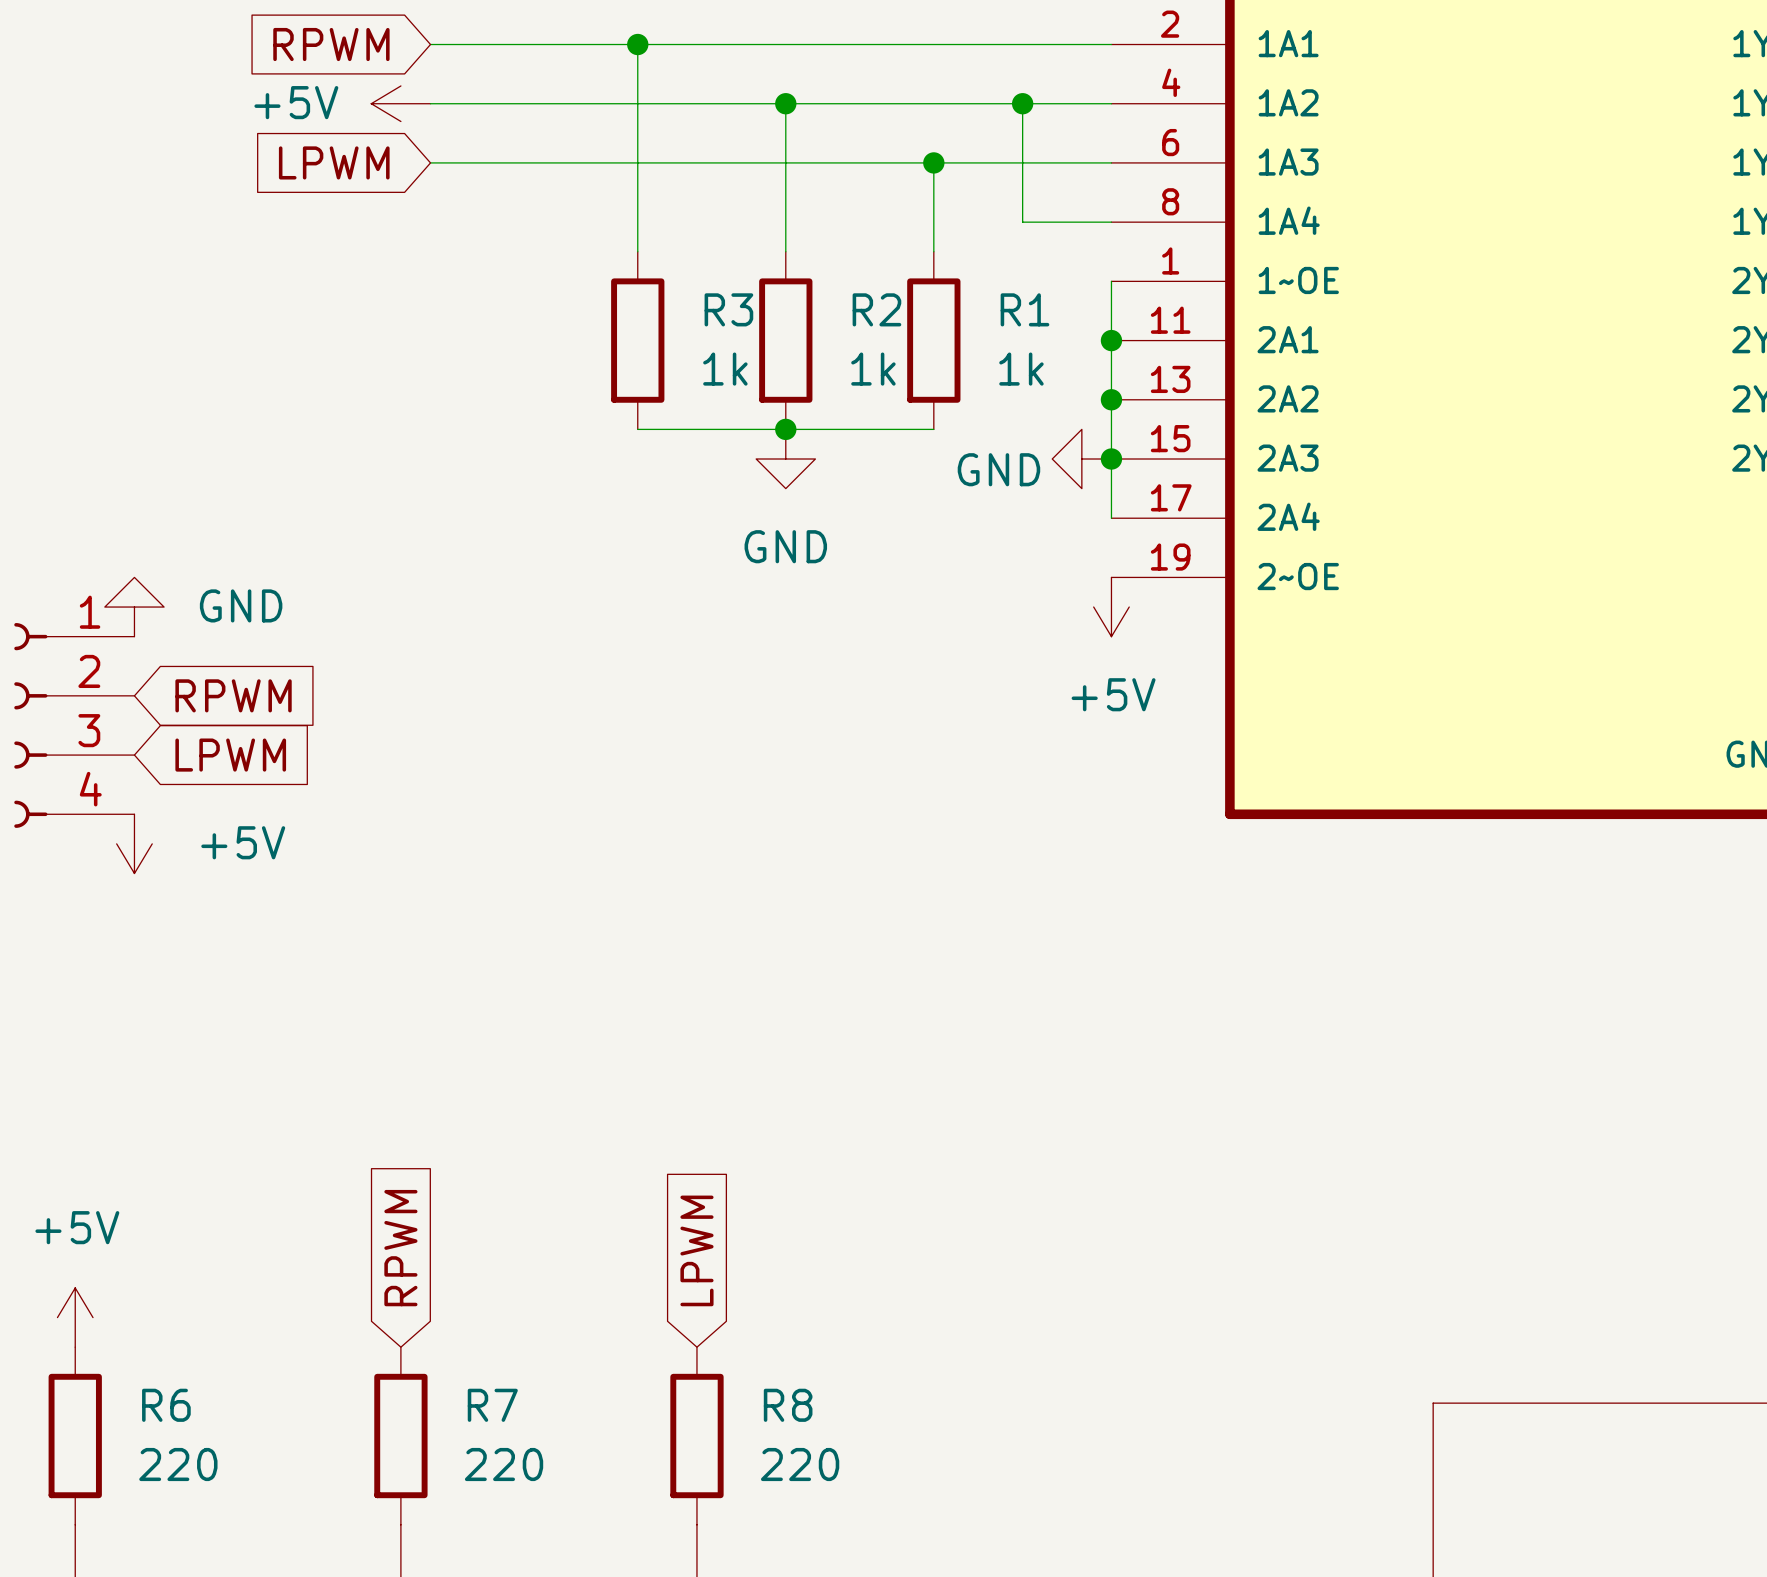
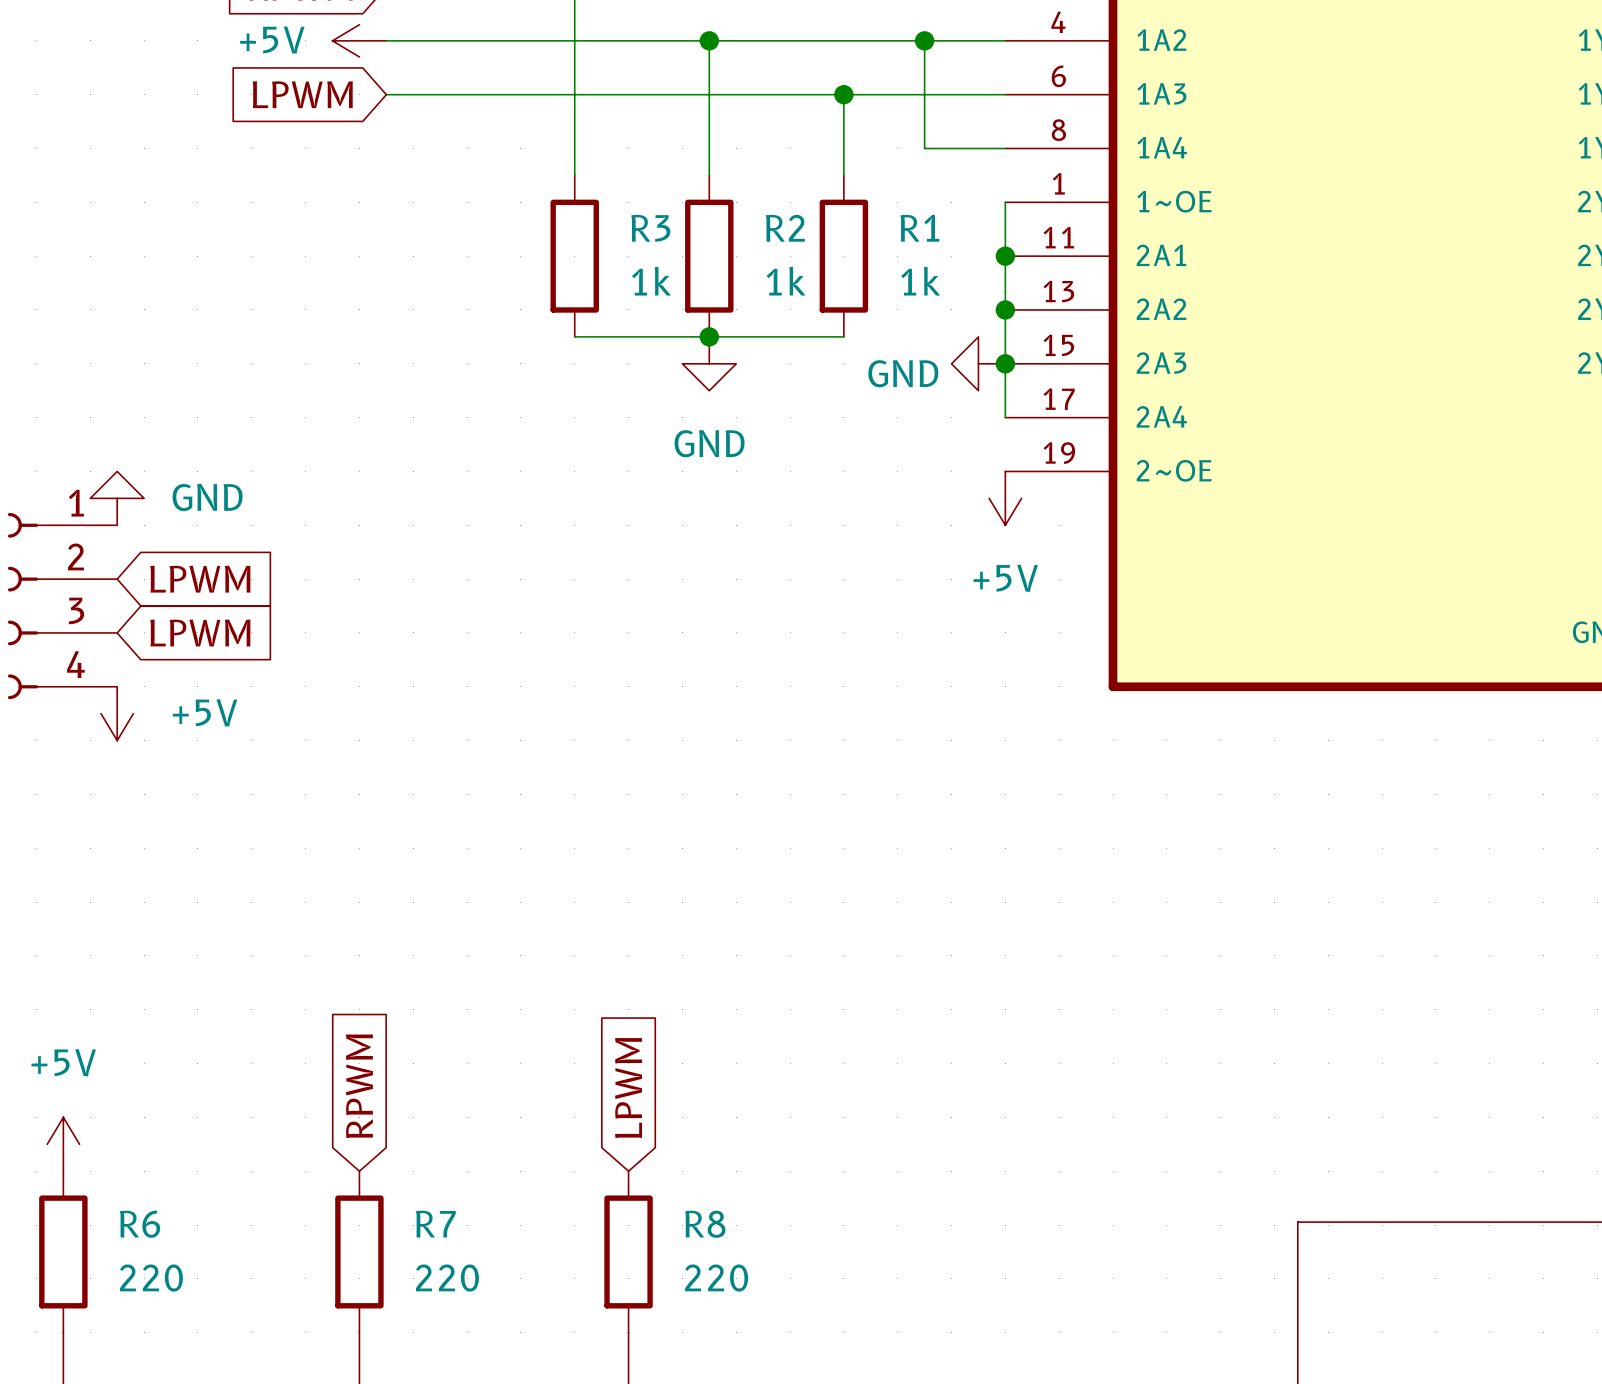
global label: RPWM (233, 695) -> LPWM (200, 579)

